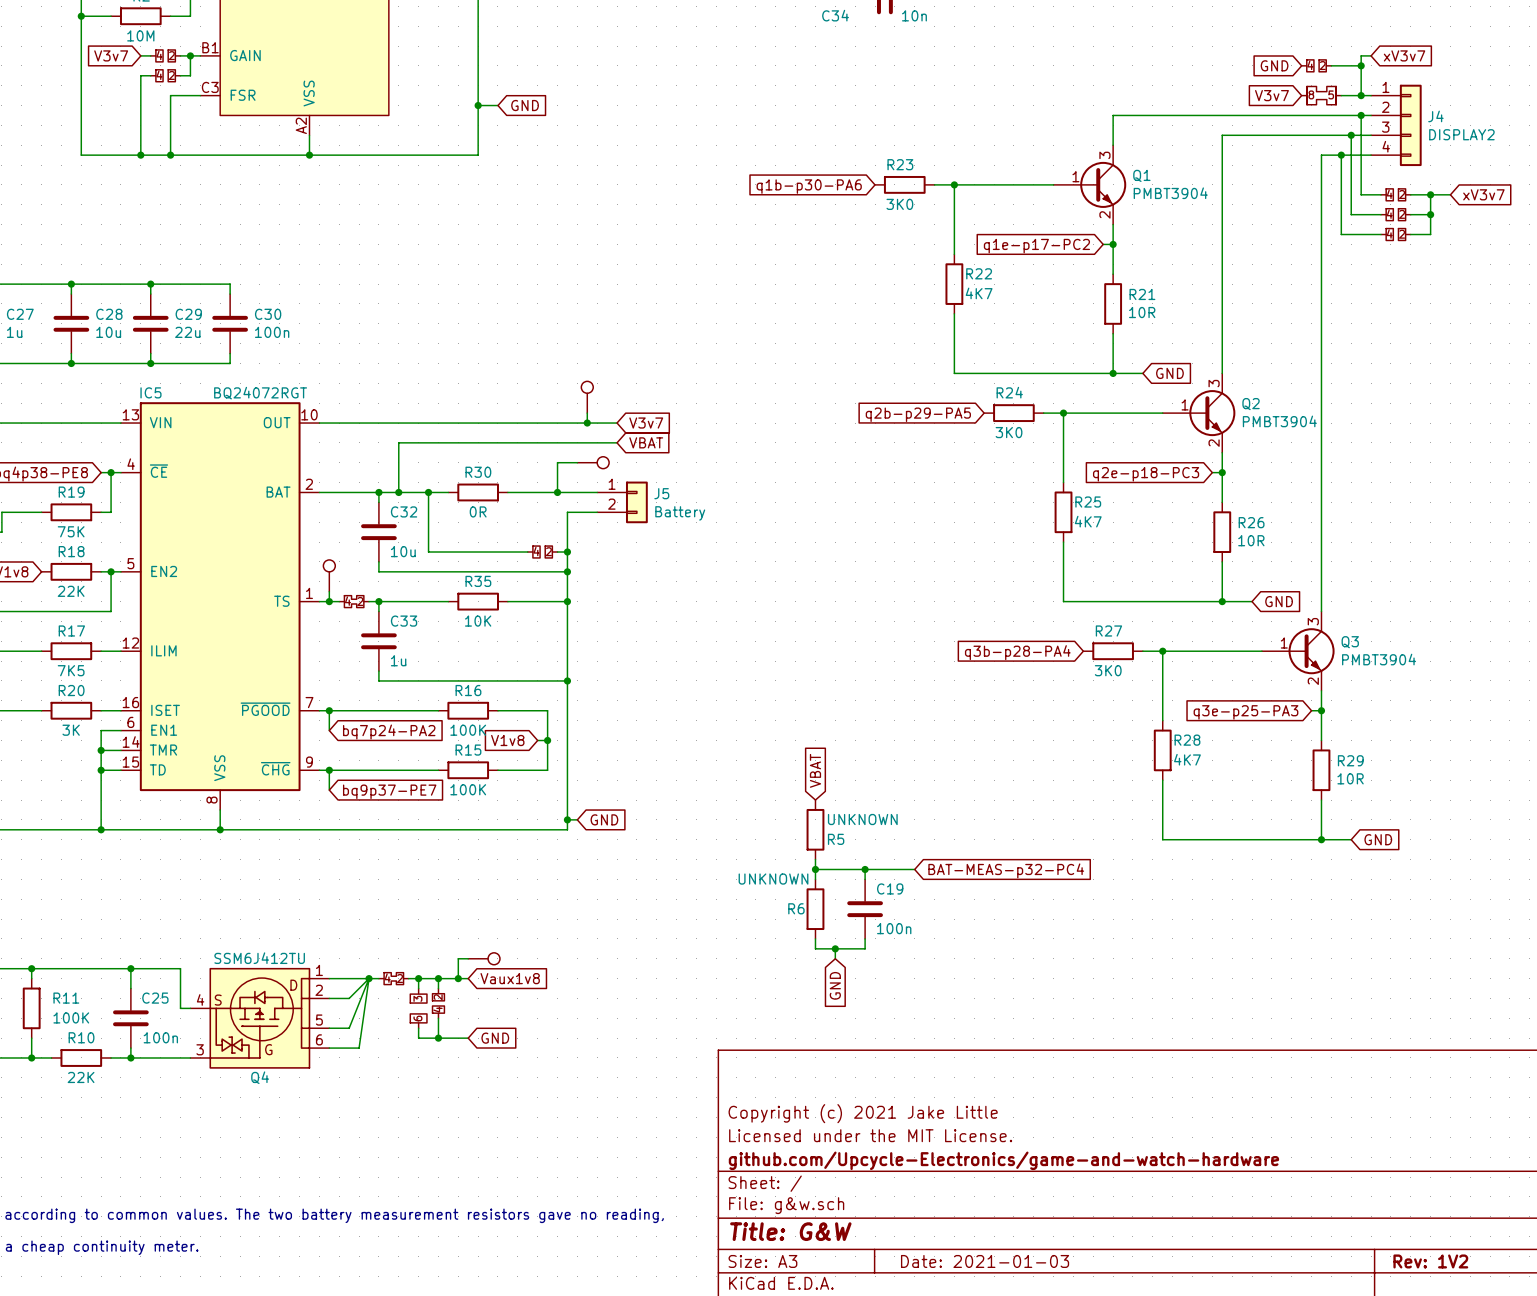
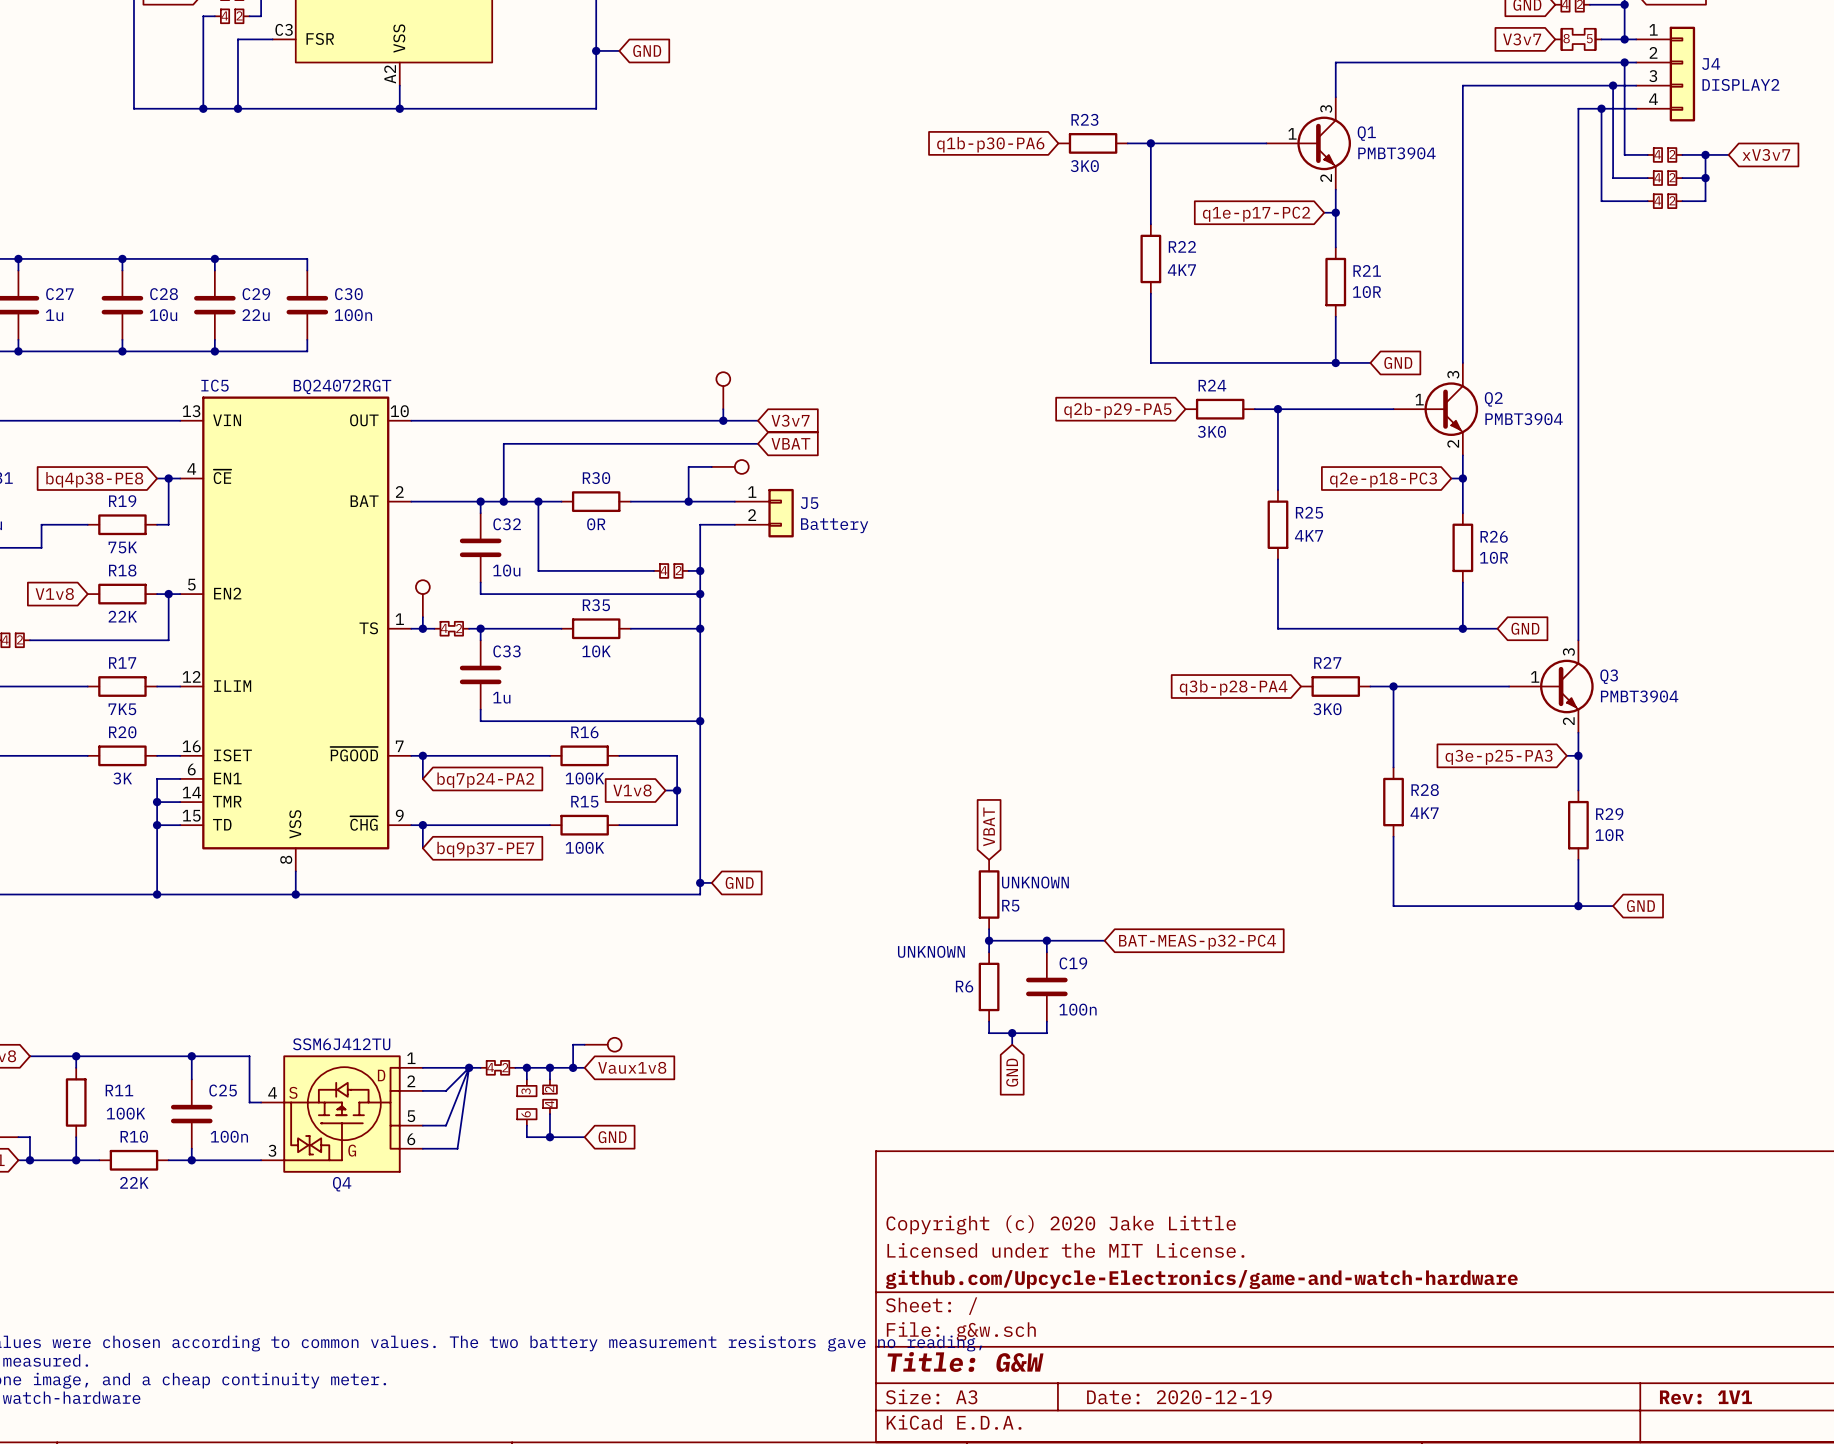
title block: Copyright (c) 2021 Jake Little (863, 1113) -> Copyright (c) 2020 Jake Little (1061, 1224)
title block: Date: 2021-01-03 (985, 1261) -> Date: 2020-12-19 (1179, 1397)
title block: Rev: 1V2 (1430, 1261) -> Rev: 1V1 (1705, 1397)

